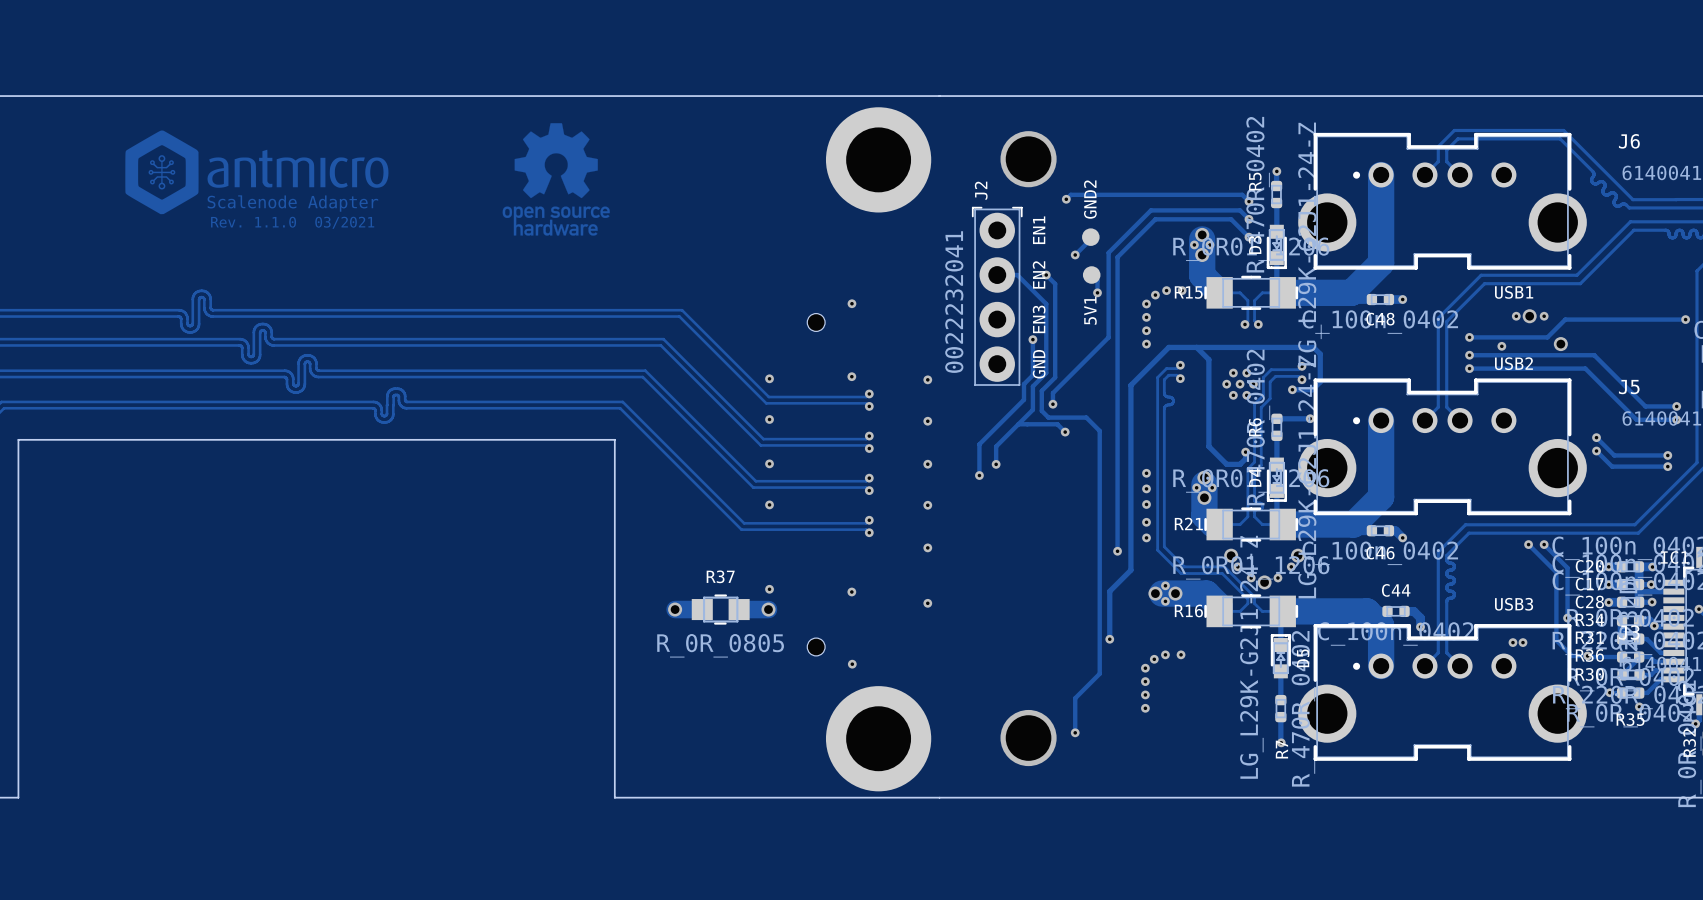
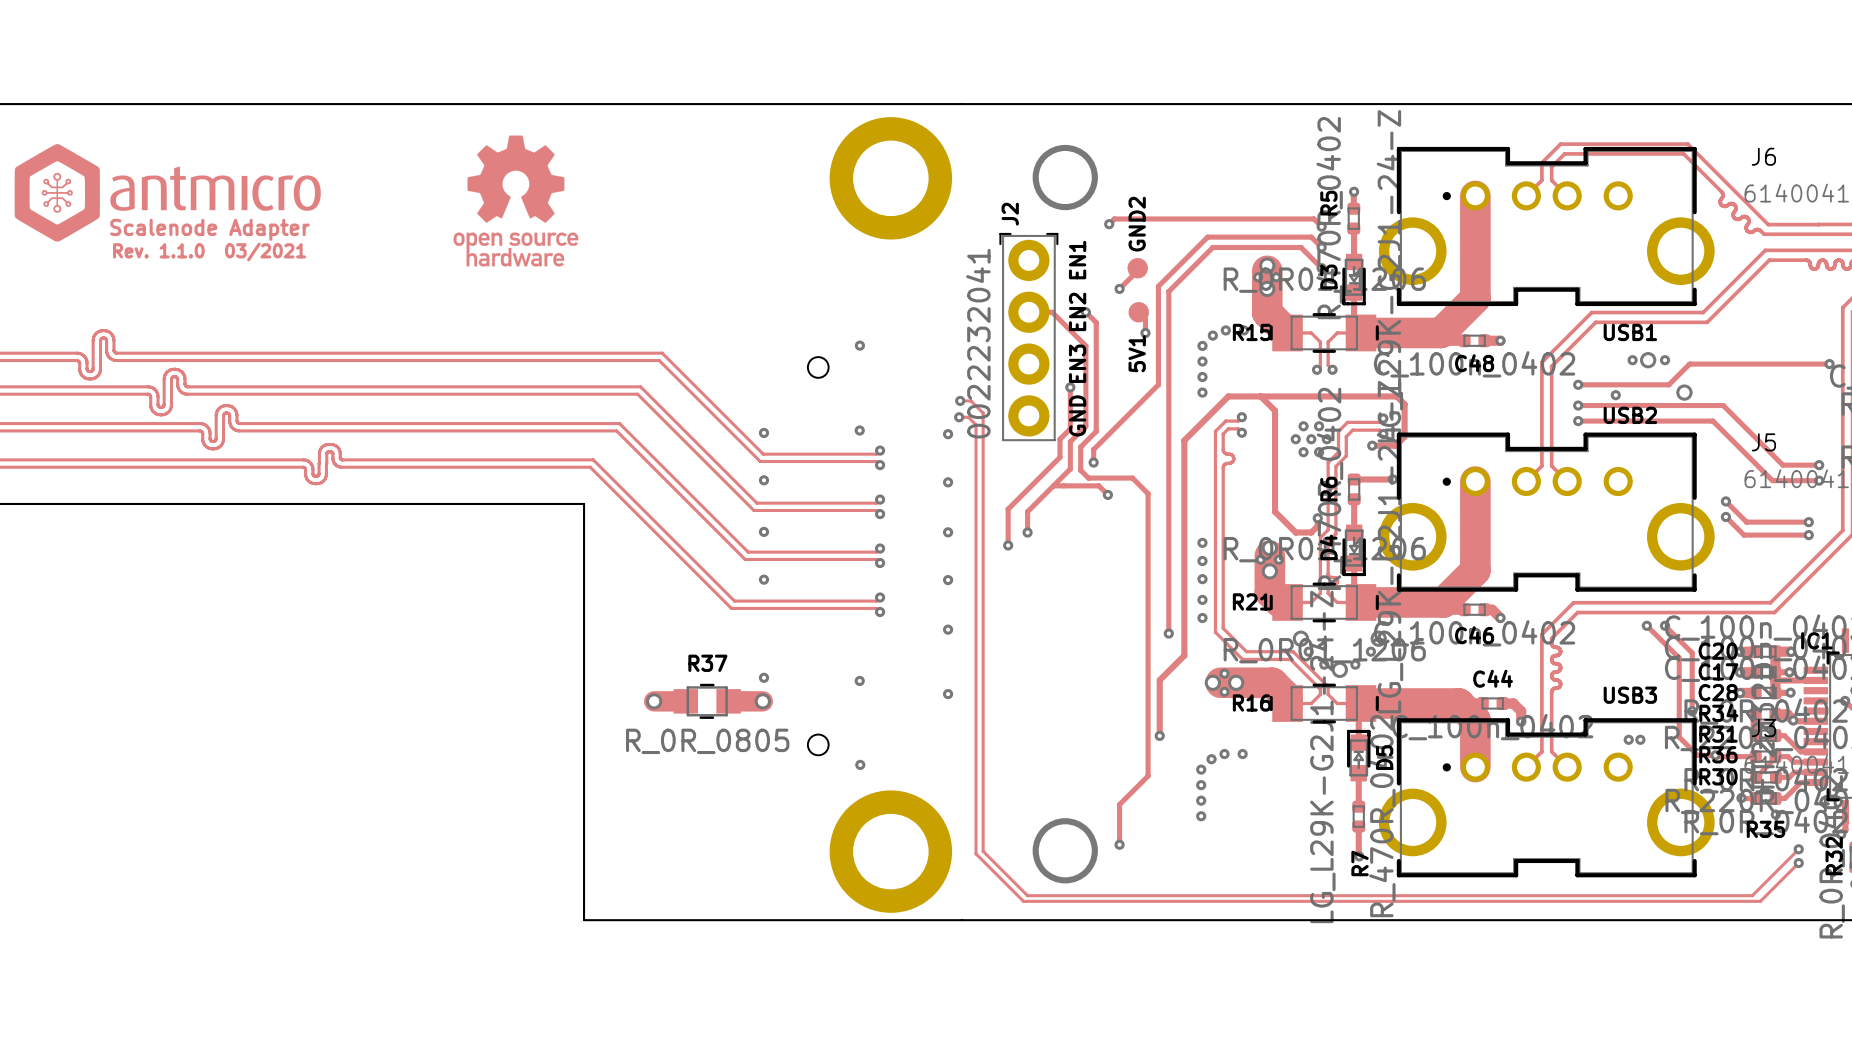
track: none -> (960, 400) (970, 400) (983, 413) (983, 851) (1027, 895) (1752, 895) (1798, 849)
via: none -> (960, 400)
track: none -> (959, 417) (968, 417) (976, 424) (976, 853) (1023, 901) (1760, 901) (1798, 863)
via: none -> (959, 417)
via: none -> (1798, 849)
via: none -> (1798, 863)

